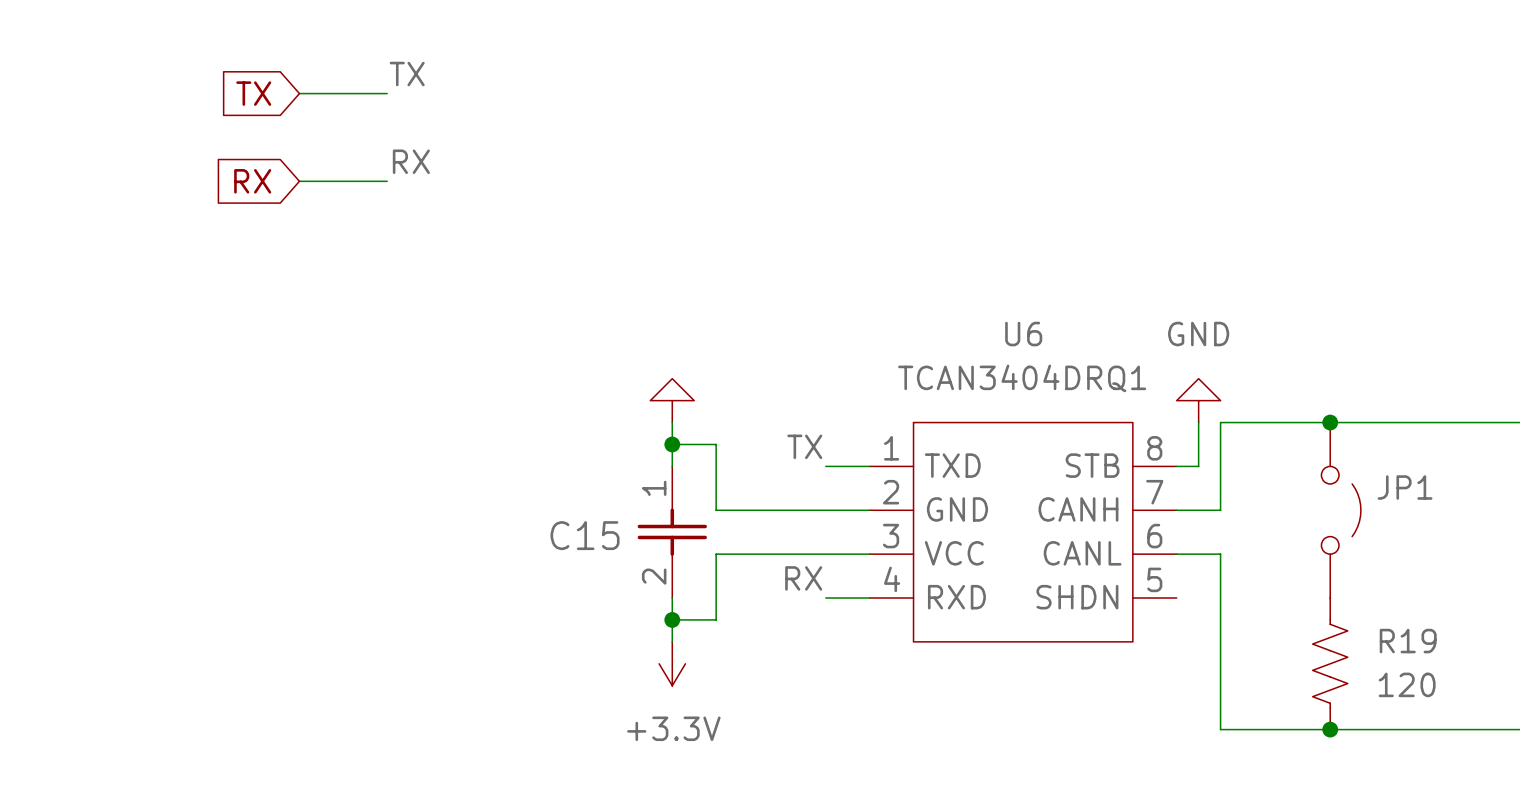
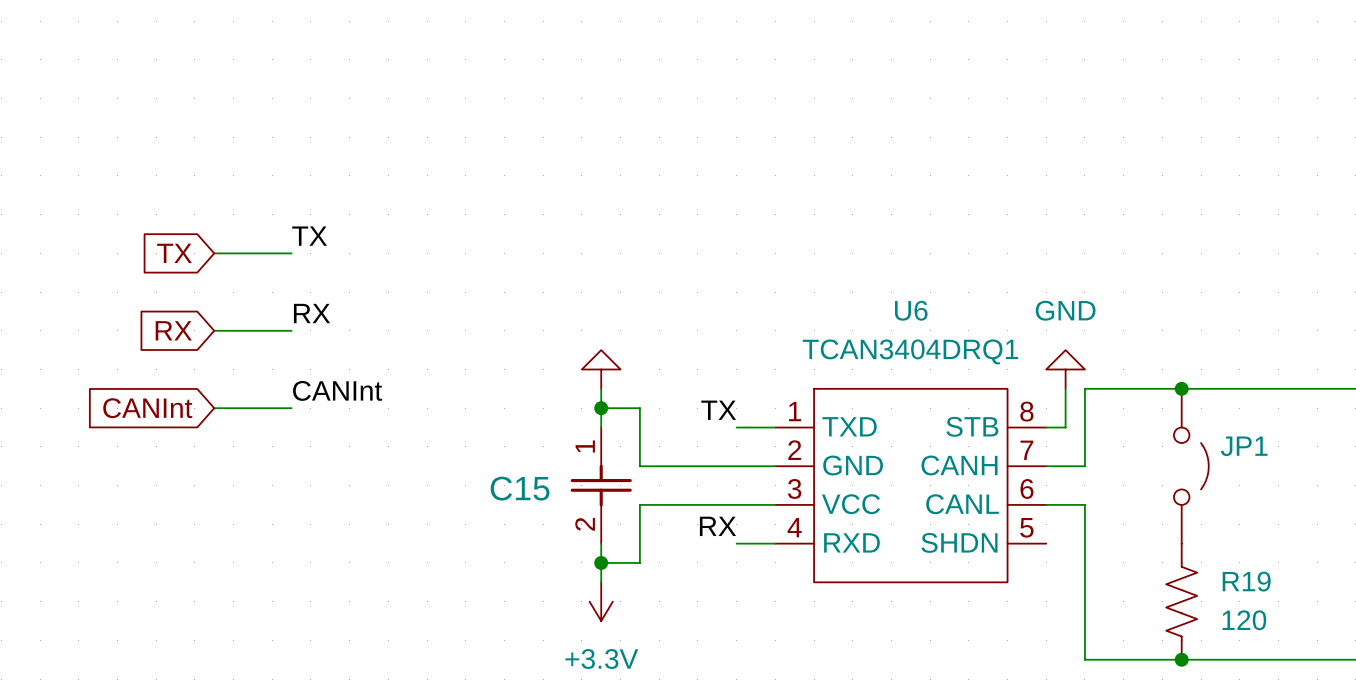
label position: TX (407, 74) -> TX (309, 236)
global label position: TX (253, 93) -> TX (174, 253)
wire: (299, 93) (387, 93) -> (214, 330) (291, 330)
label position: RX (411, 161) -> RX (312, 313)
global label position: RX (252, 181) -> RX (173, 330)
wire: (299, 181) (387, 181) -> (214, 253) (291, 253)
label: none -> CANInt (337, 390)
global label: none -> CANInt (147, 408)
wire: none -> (214, 408) (291, 408)

